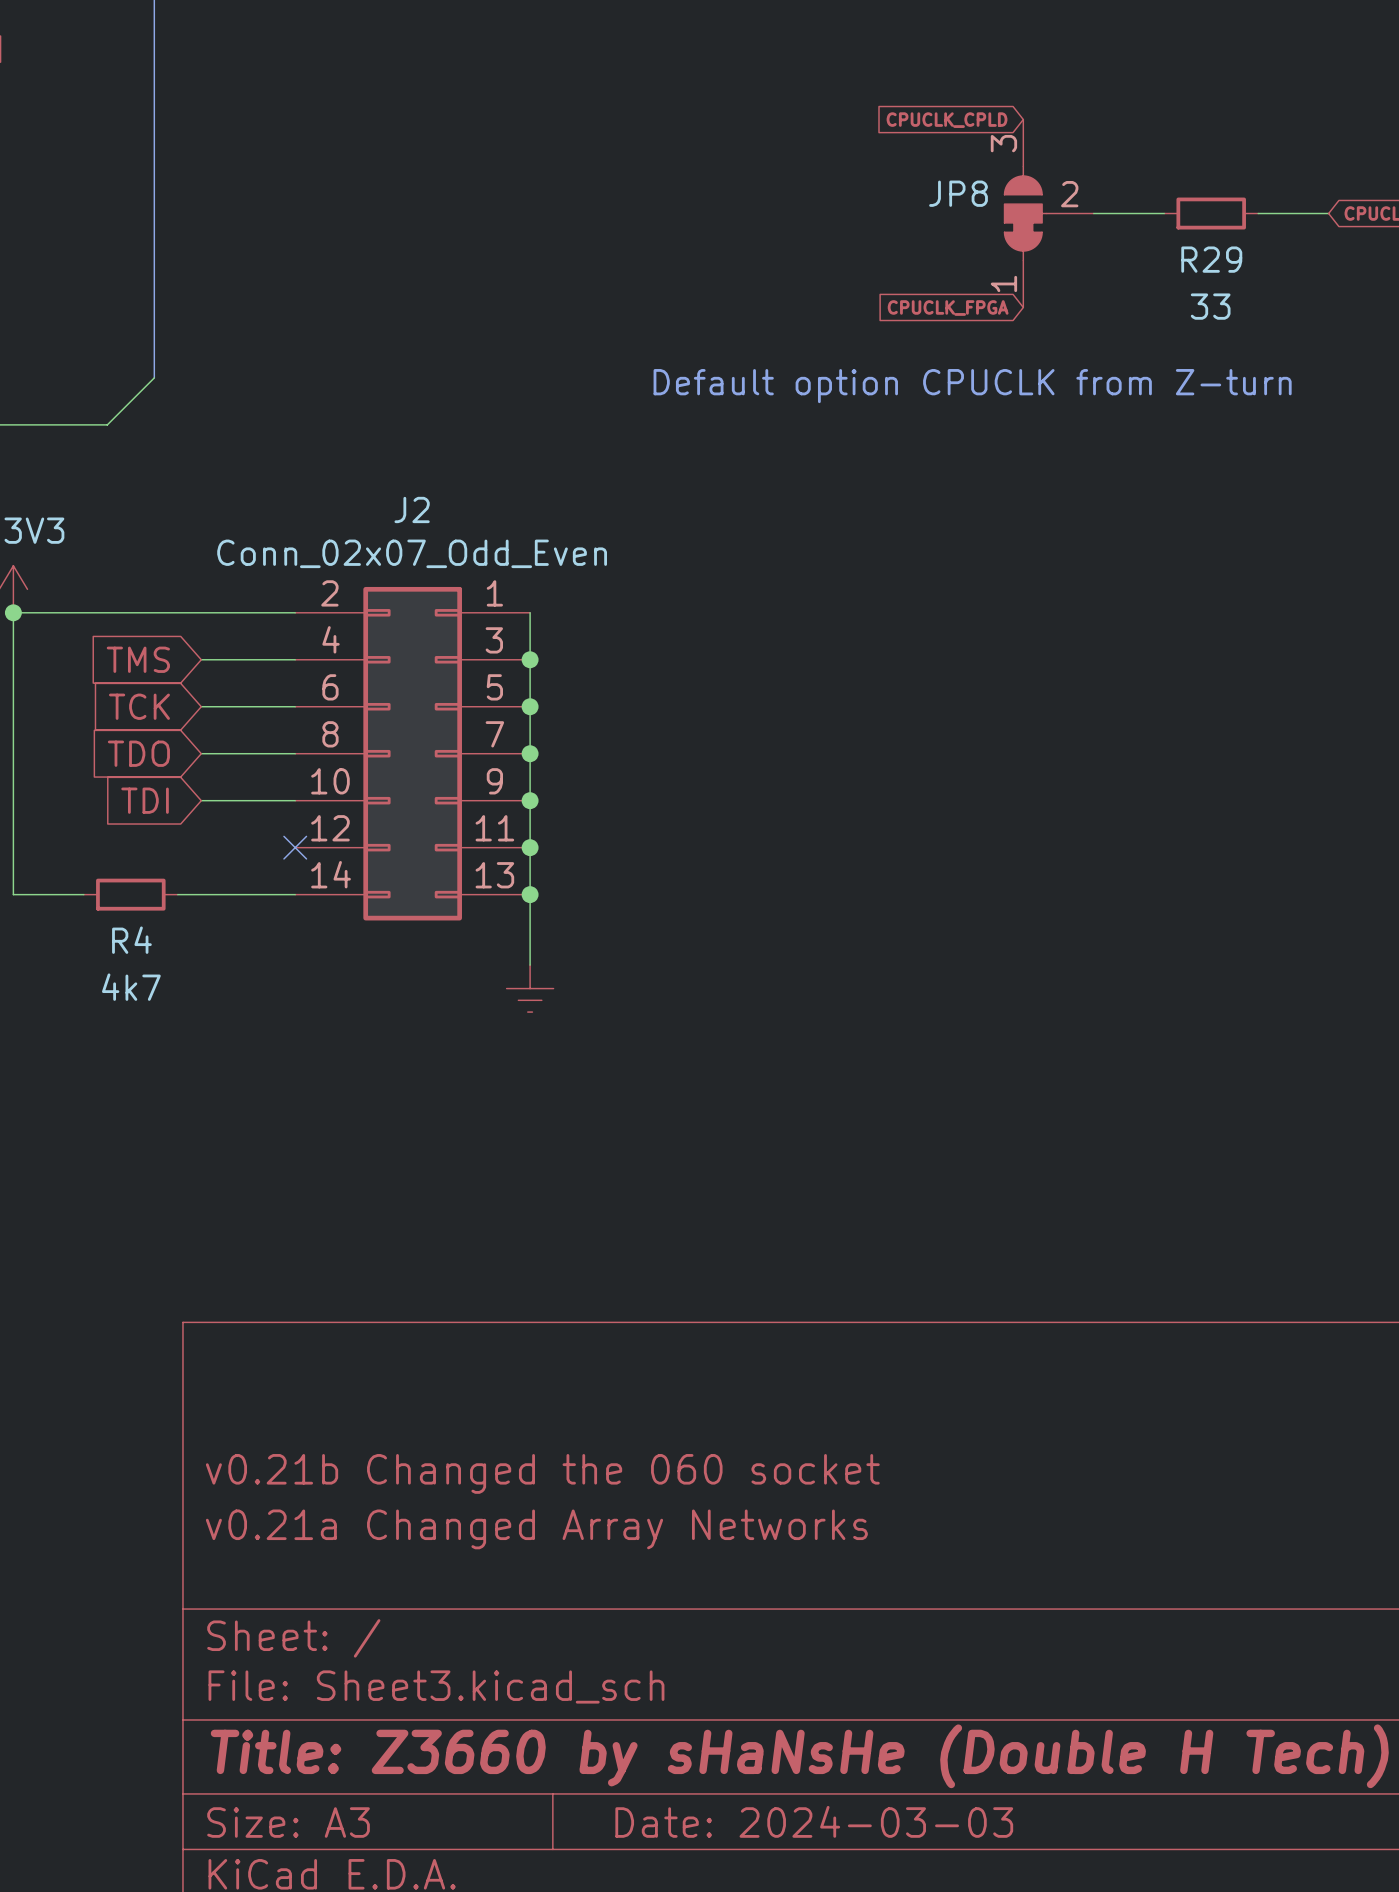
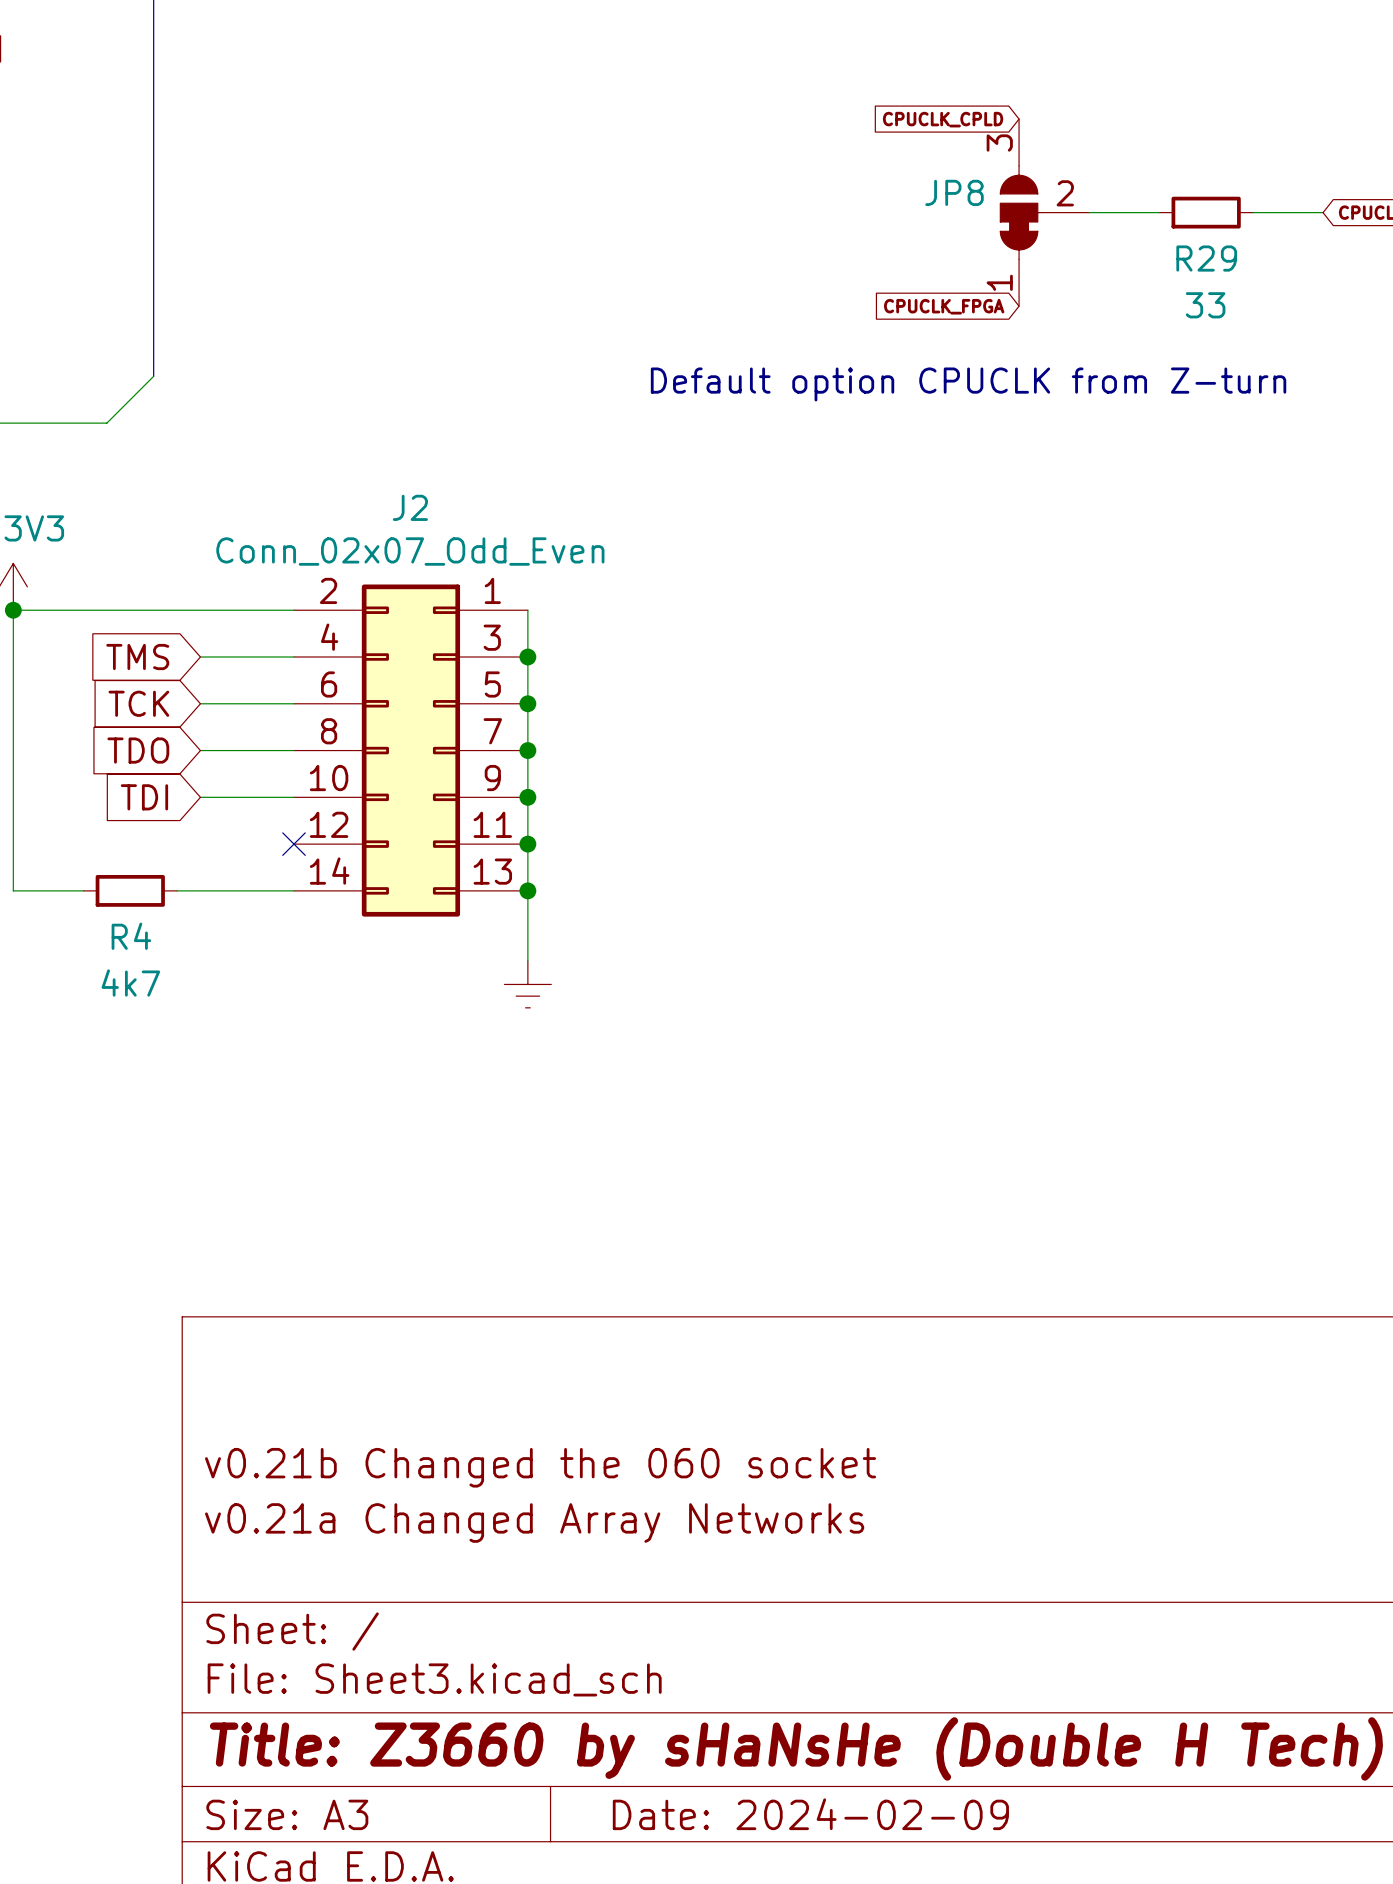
title block: Date: 2024-03-03 (814, 1821) -> Date: 2024-02-09 (810, 1814)

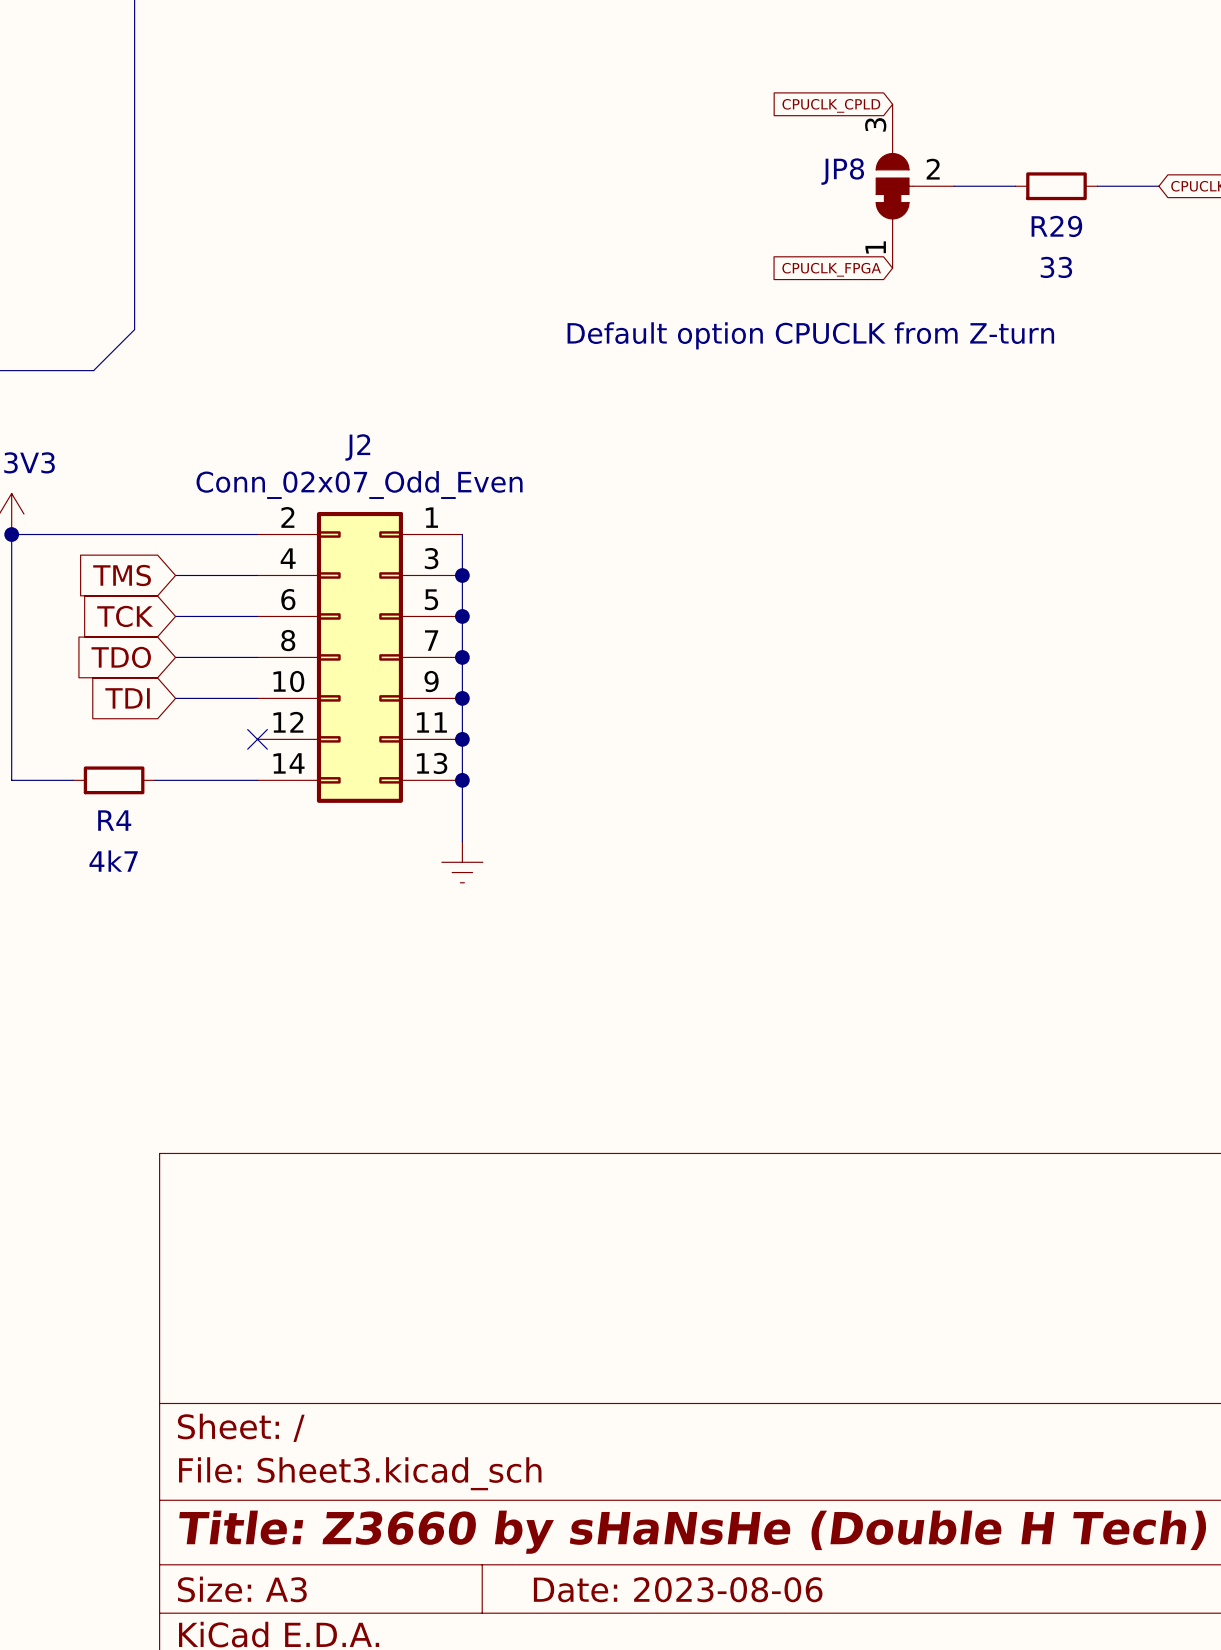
title block: v0.21b Changed the 060 socket (540, 1467) -> none
title block: v0.21a Changed Array Networks (534, 1523) -> none
title block: Date: 2024-02-09 (810, 1814) -> Date: 2023-08-06 (678, 1589)

